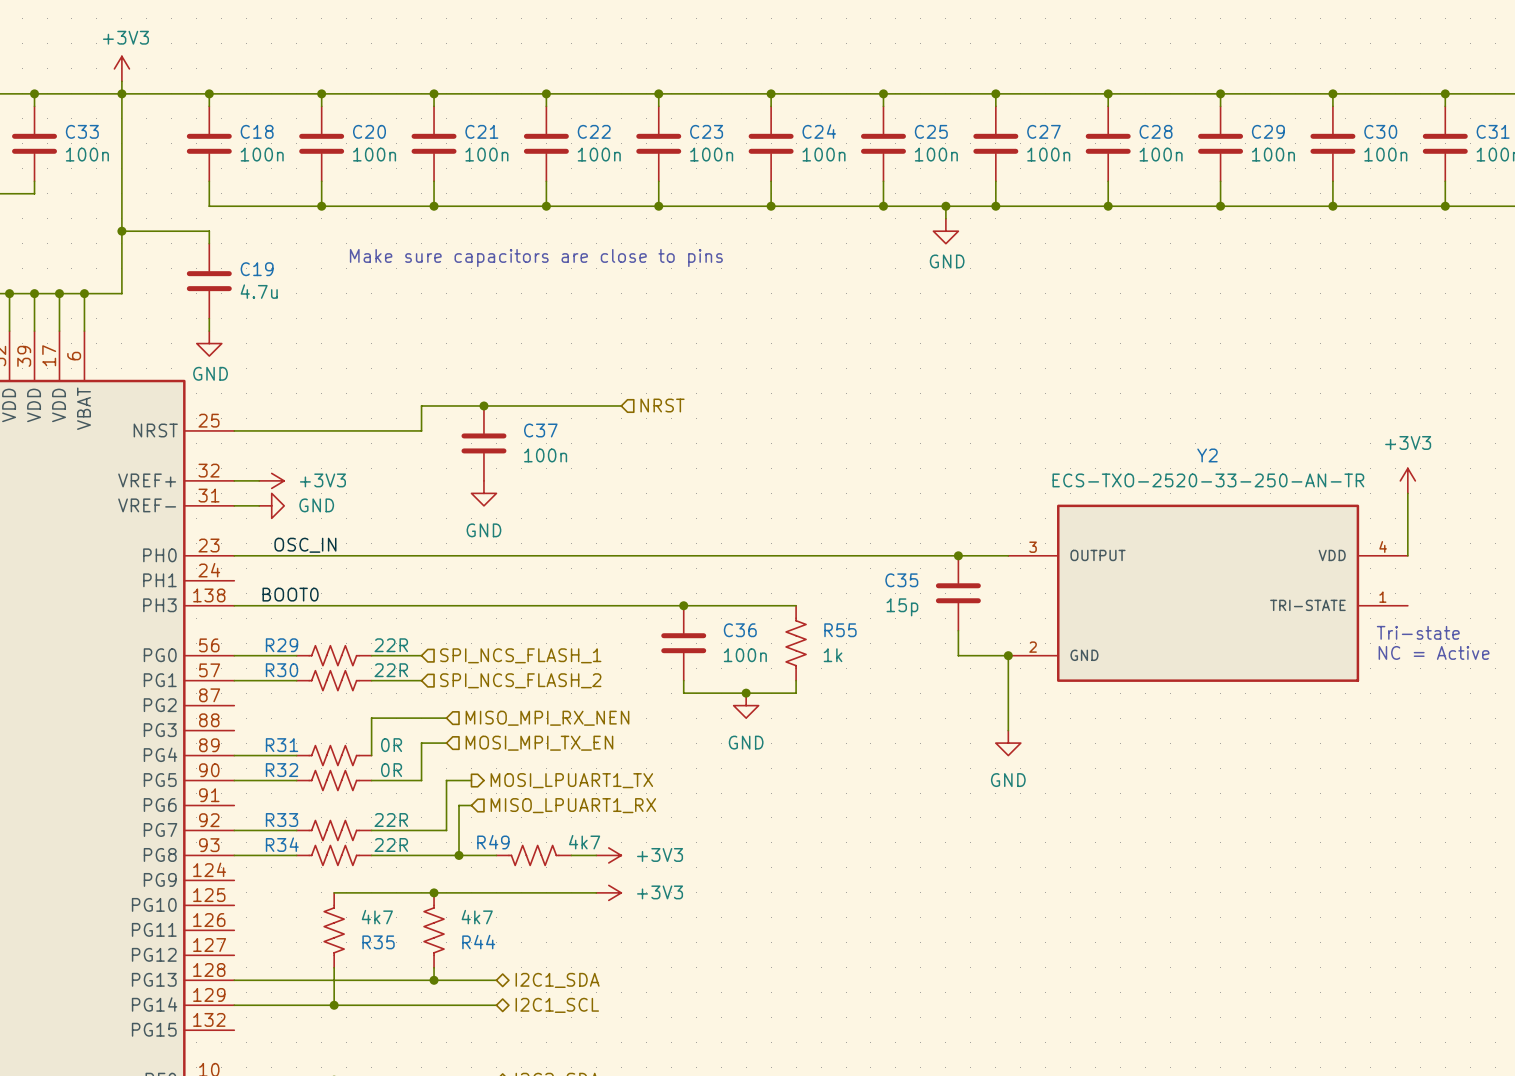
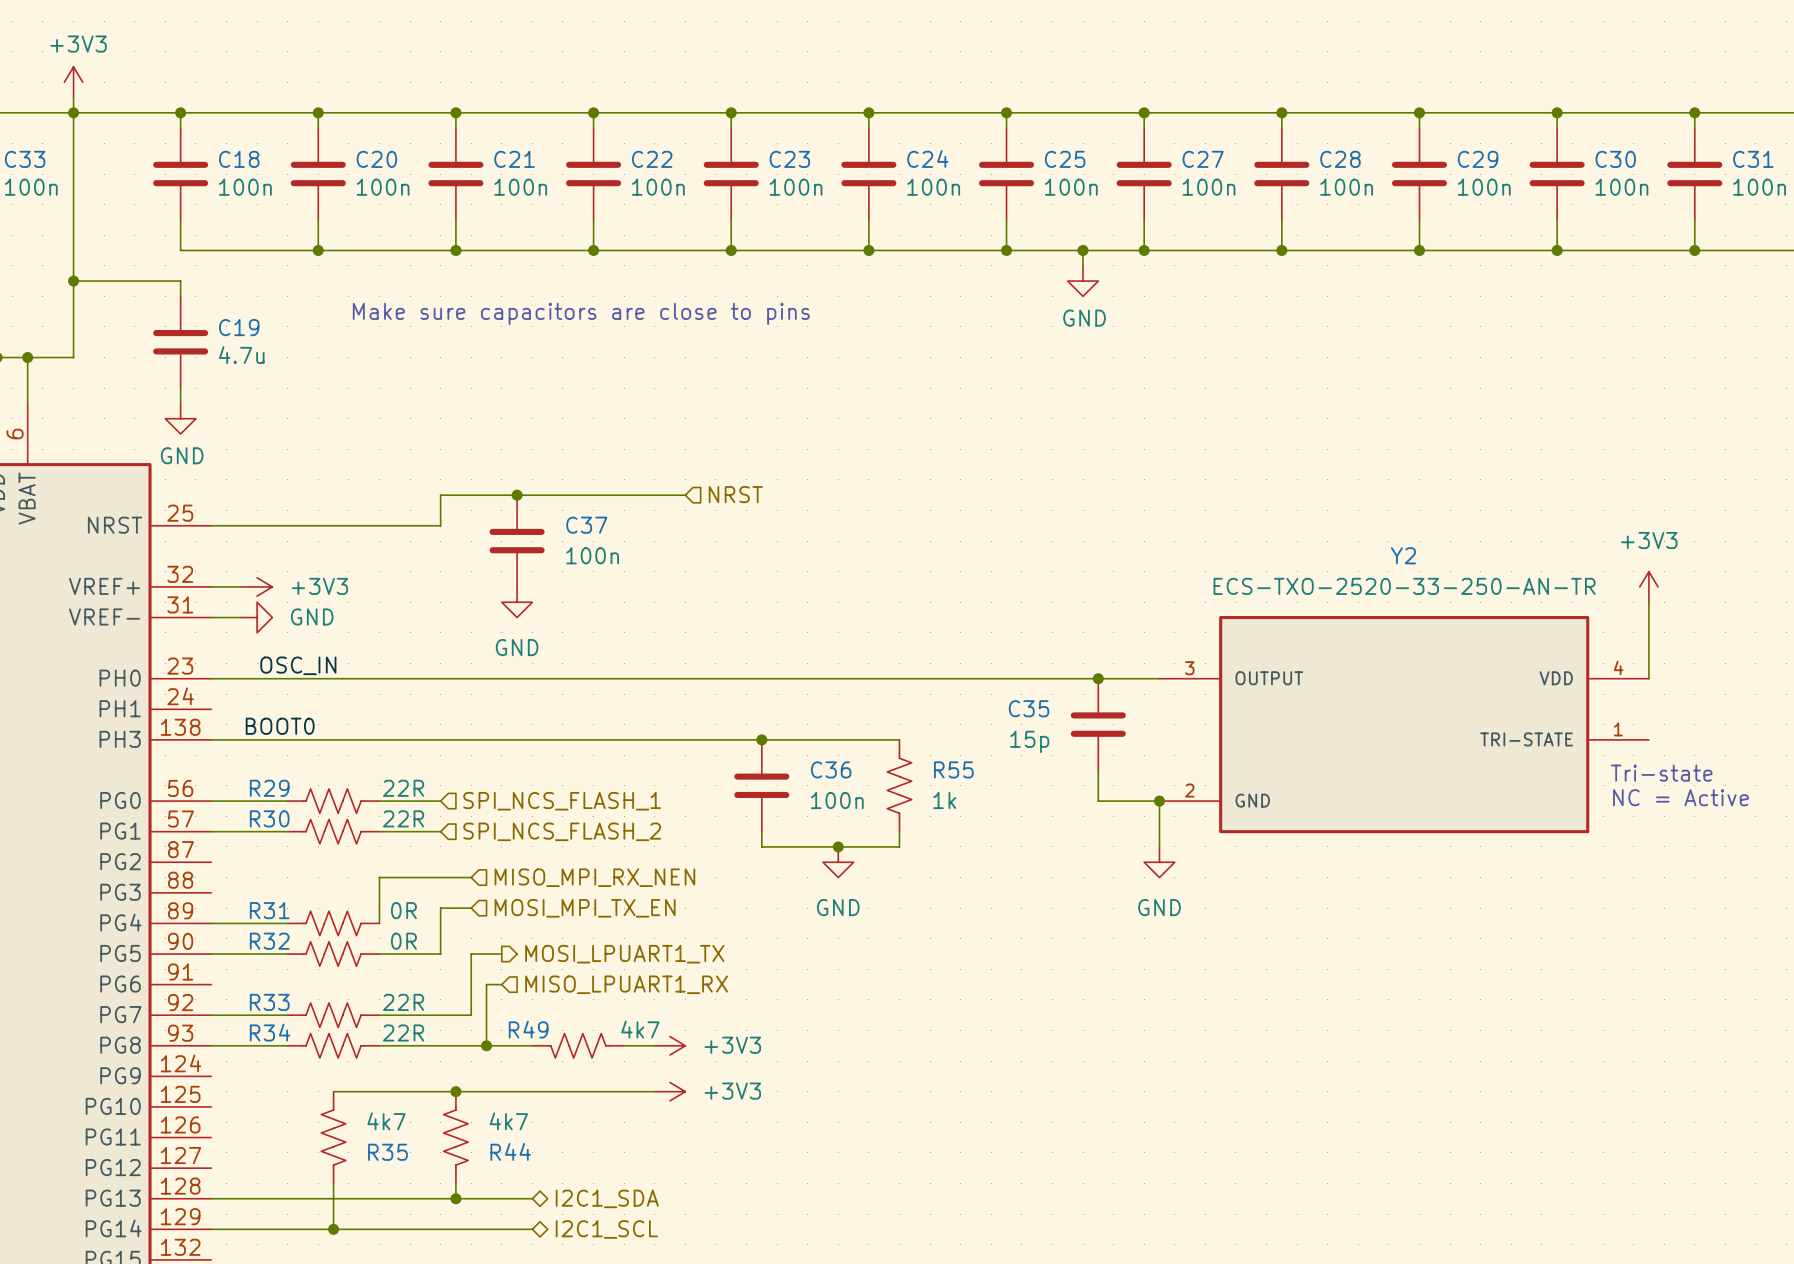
wire: (1008, 693) (1008, 730) -> none
power symbol position: GND (1008, 743) -> GND (1159, 862)

